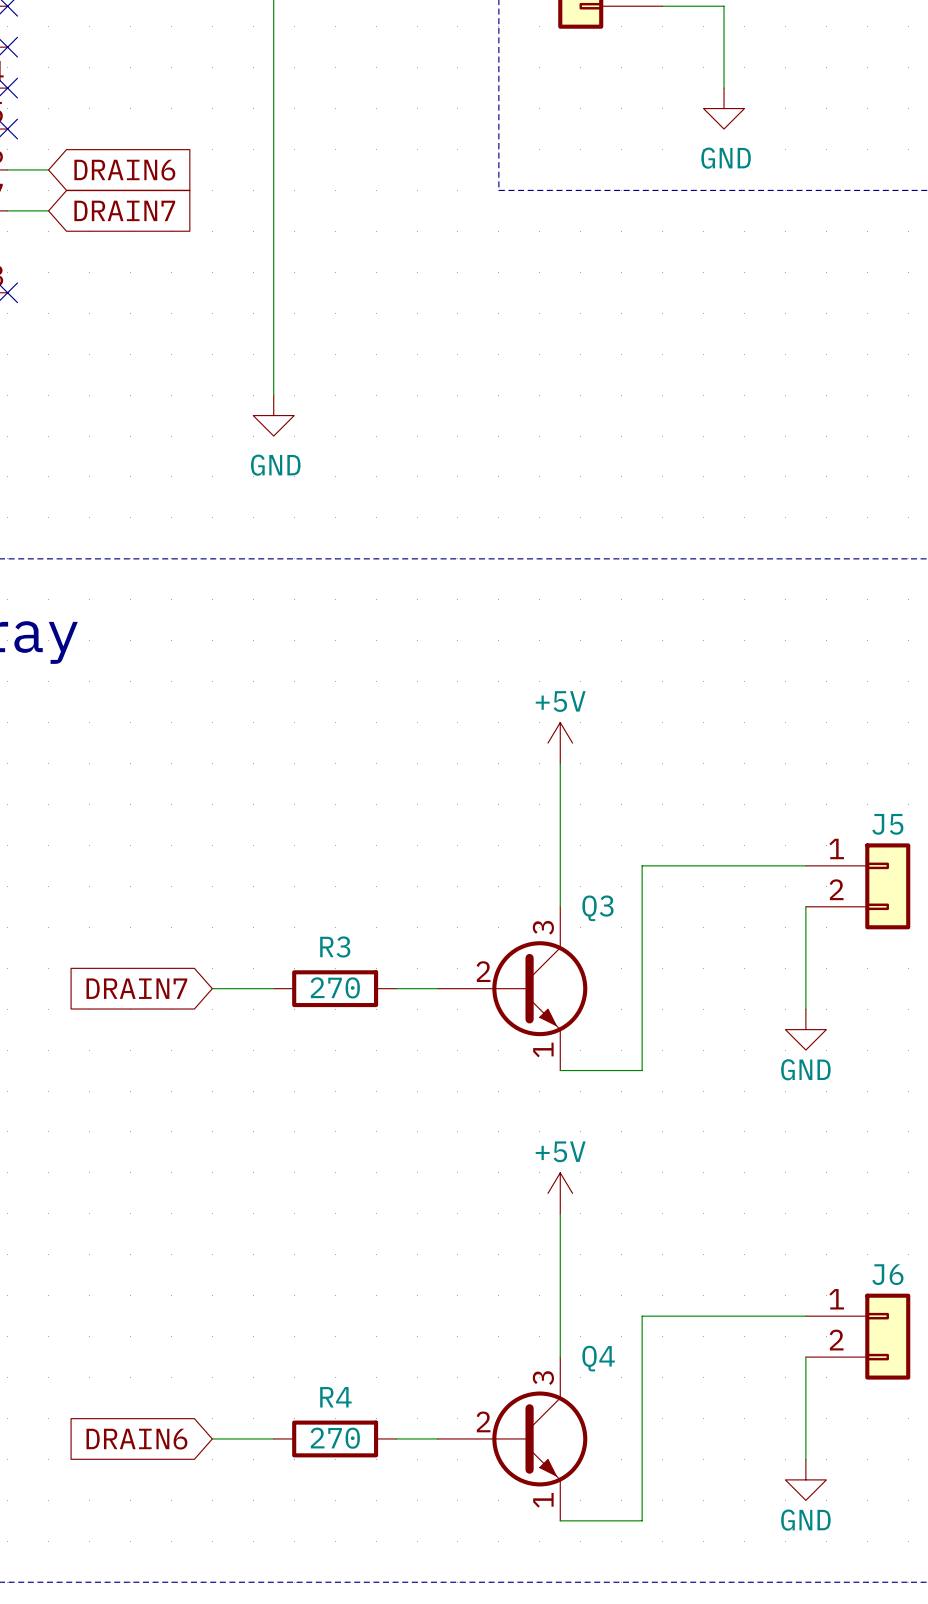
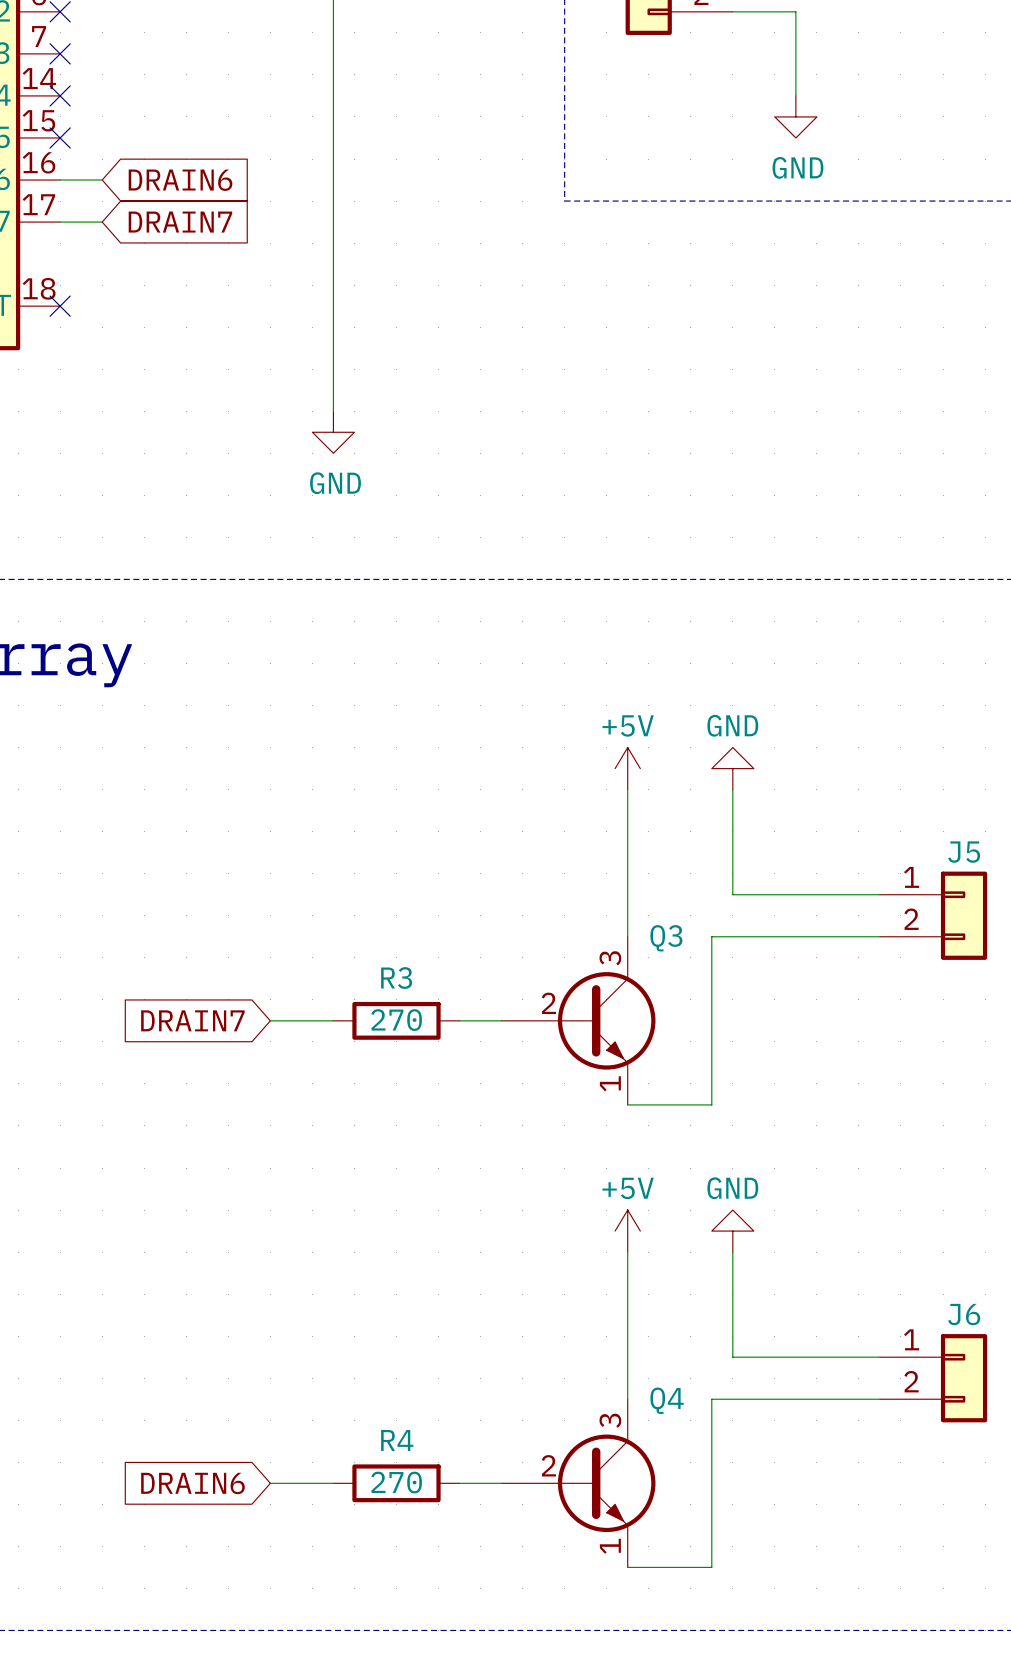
power symbol: none -> GND (732, 768)
wire: (662, 865) (642, 865) (642, 906) -> (732, 894) (732, 789)
wire: (805, 906) (805, 1009) -> (879, 936) (711, 936)
power symbol: GND (805, 1029) -> none
power symbol: none -> GND (732, 1231)
wire: (662, 1316) (642, 1316) (642, 1357) -> (732, 1357) (732, 1252)
wire: (805, 1357) (805, 1459) -> (879, 1399) (711, 1399)
power symbol: GND (805, 1479) -> none

